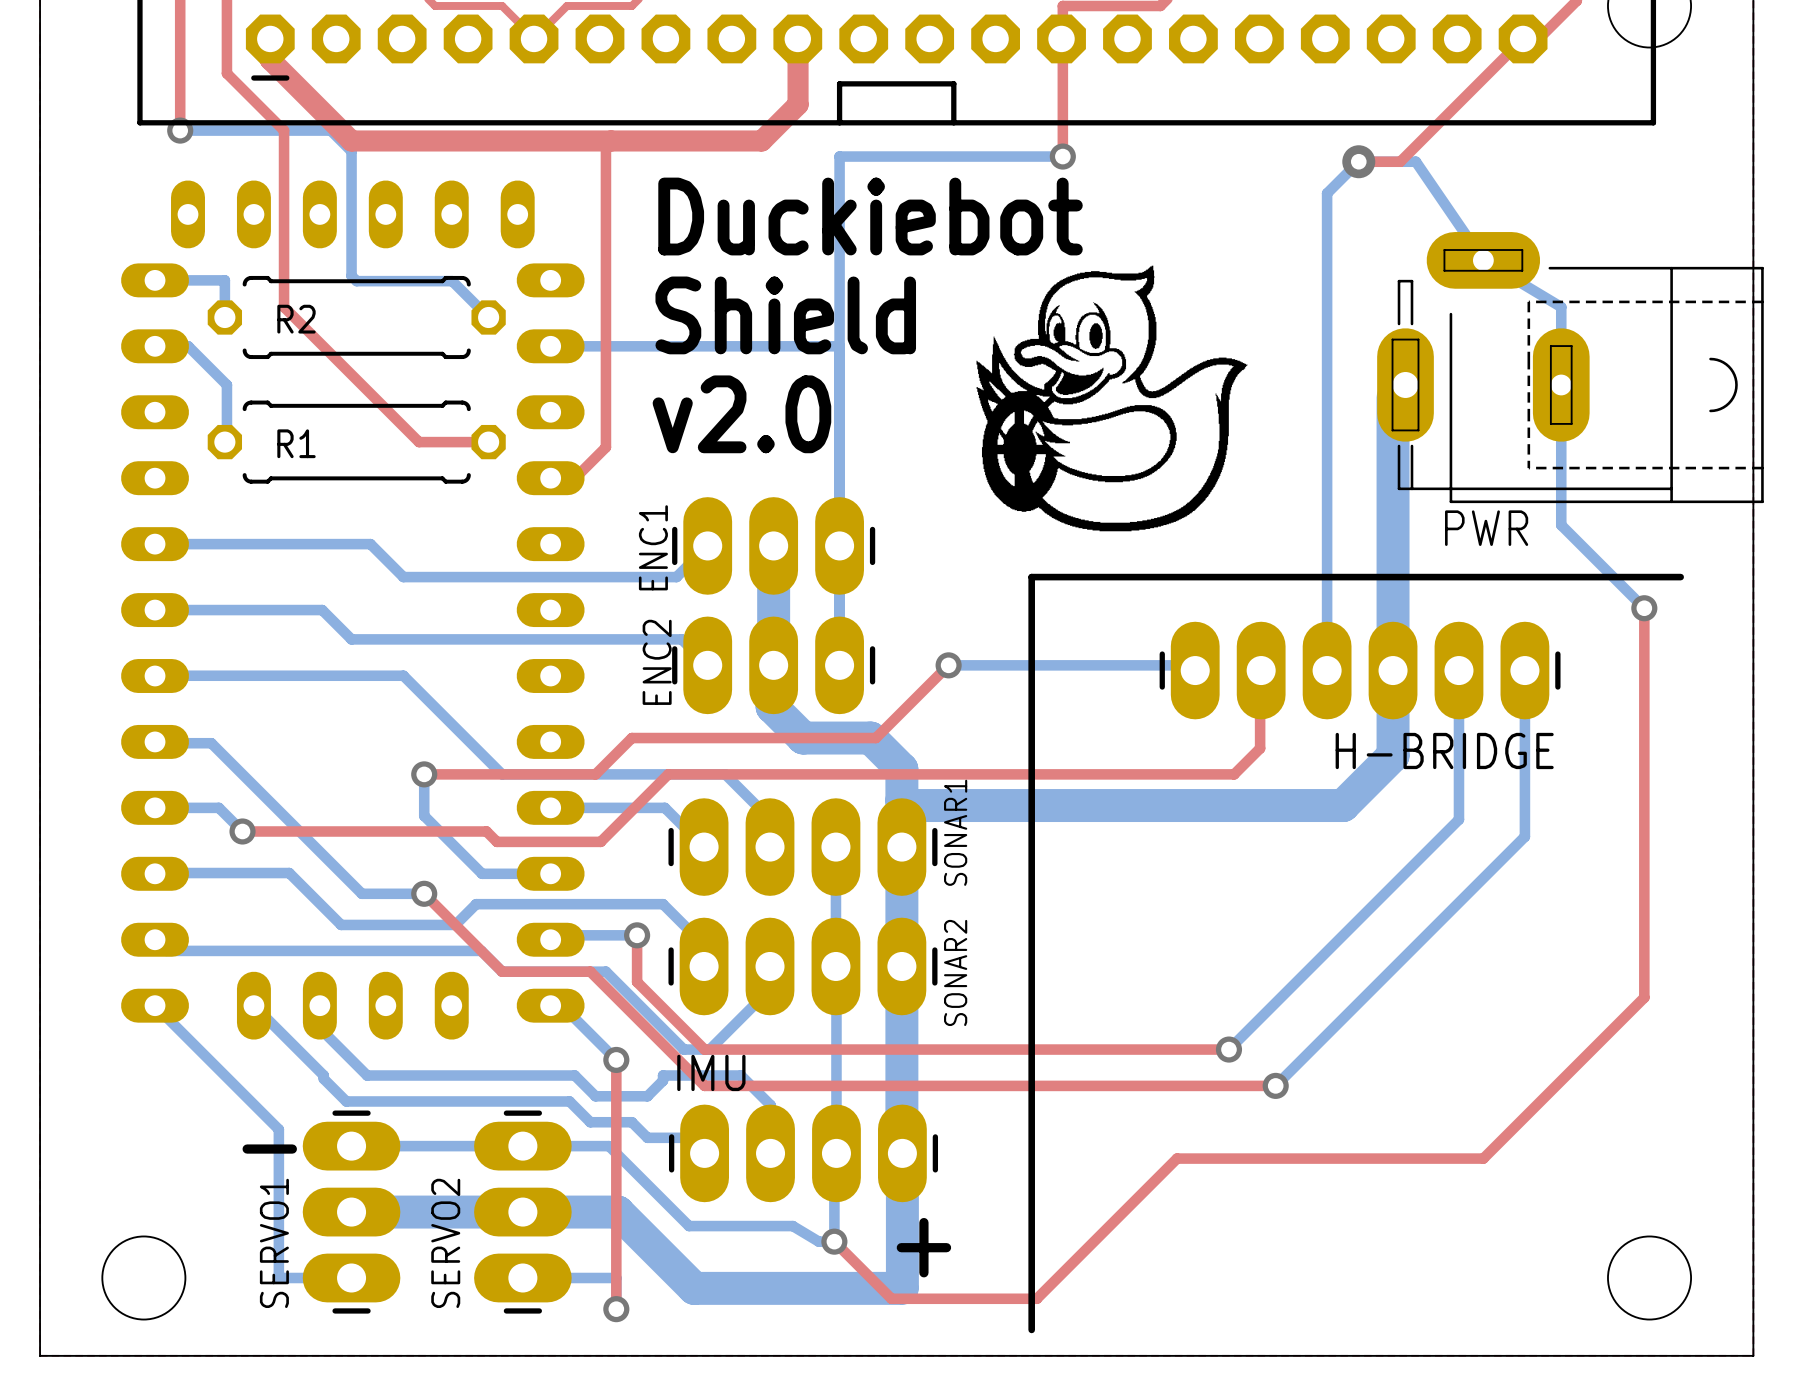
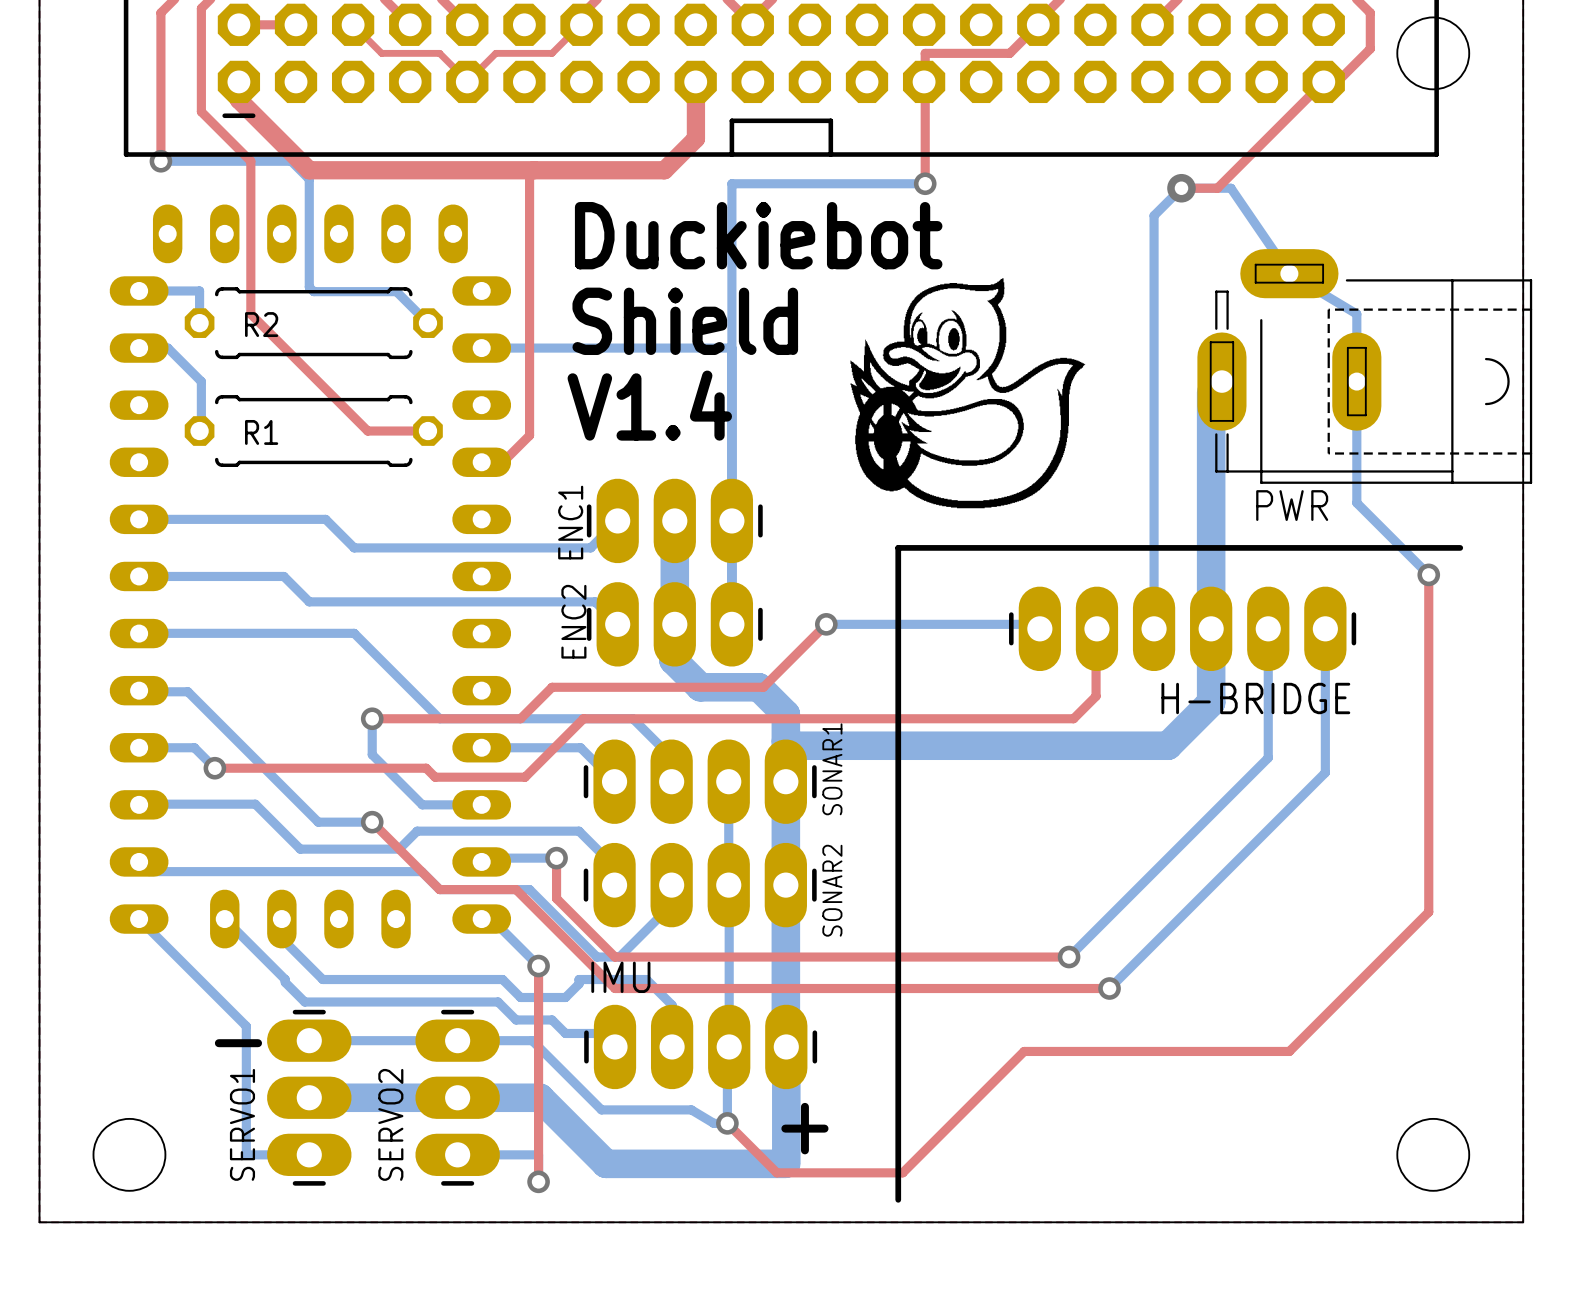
text: v2.0 (741, 414) -> V1.4 (649, 405)

